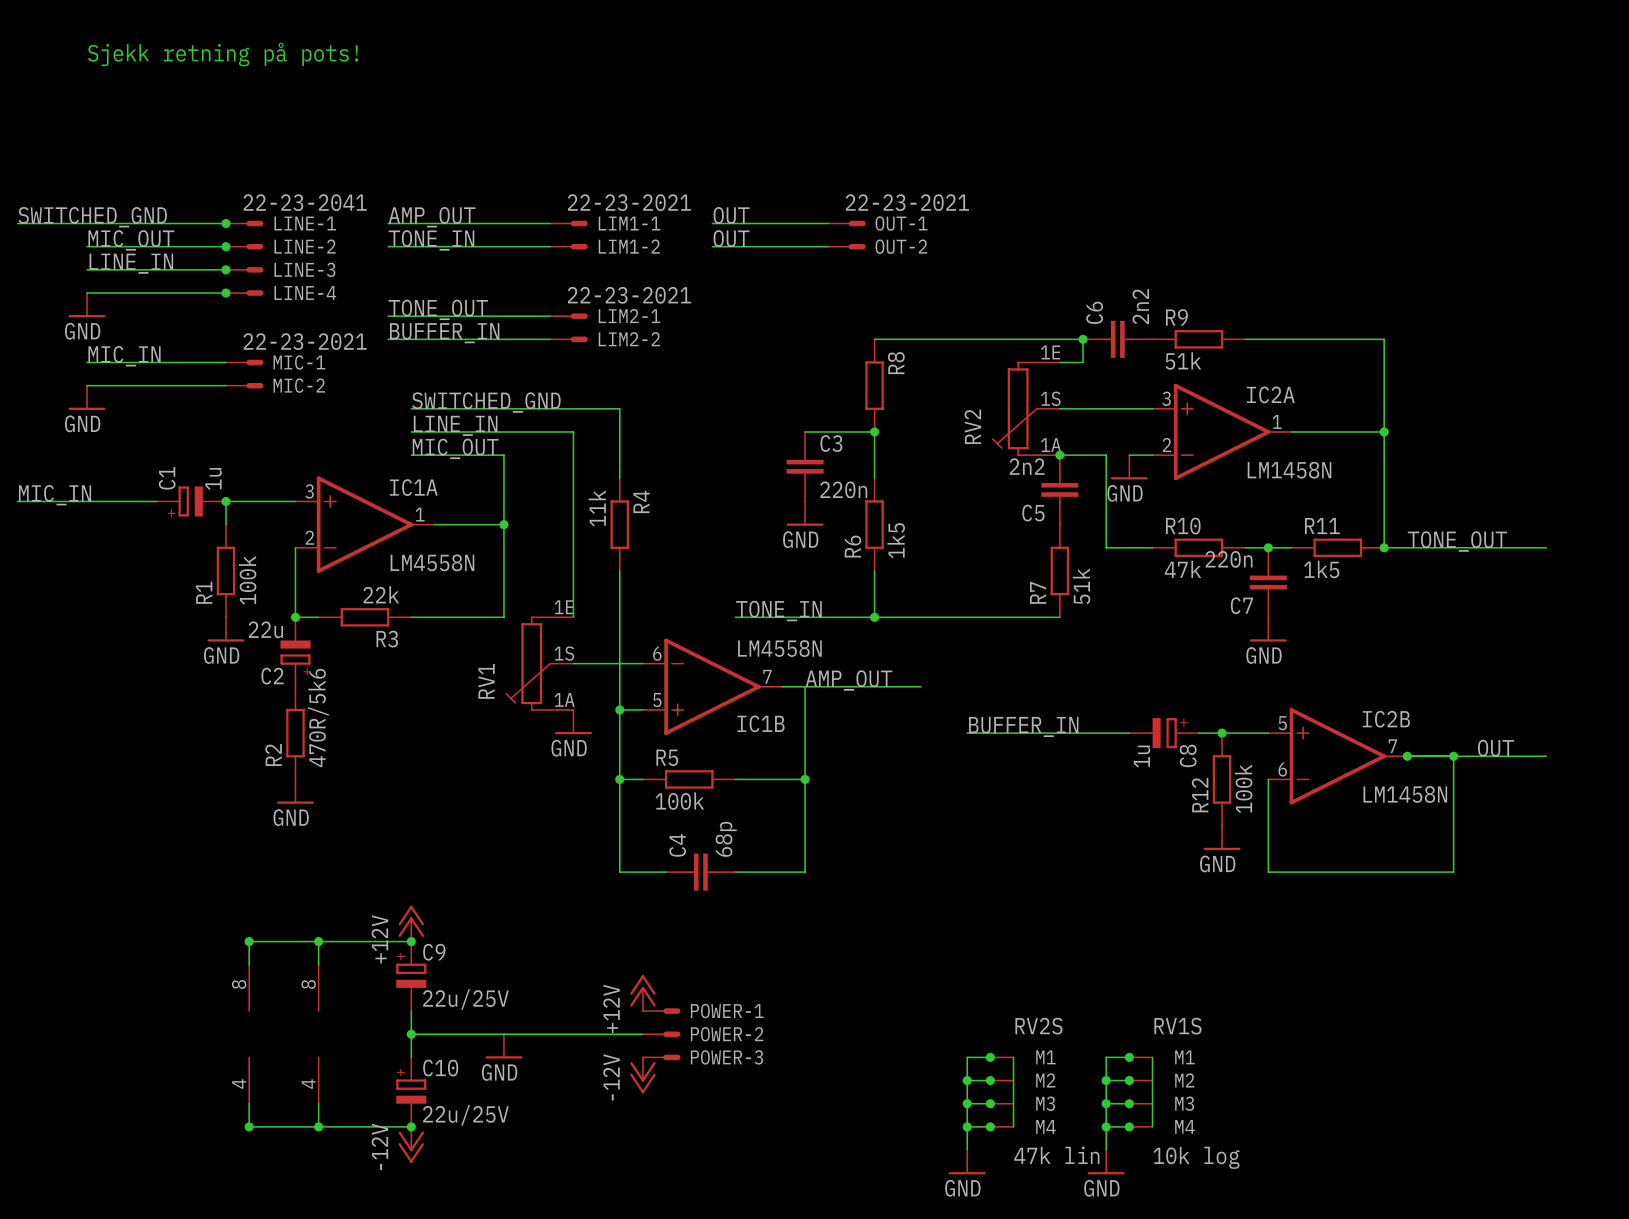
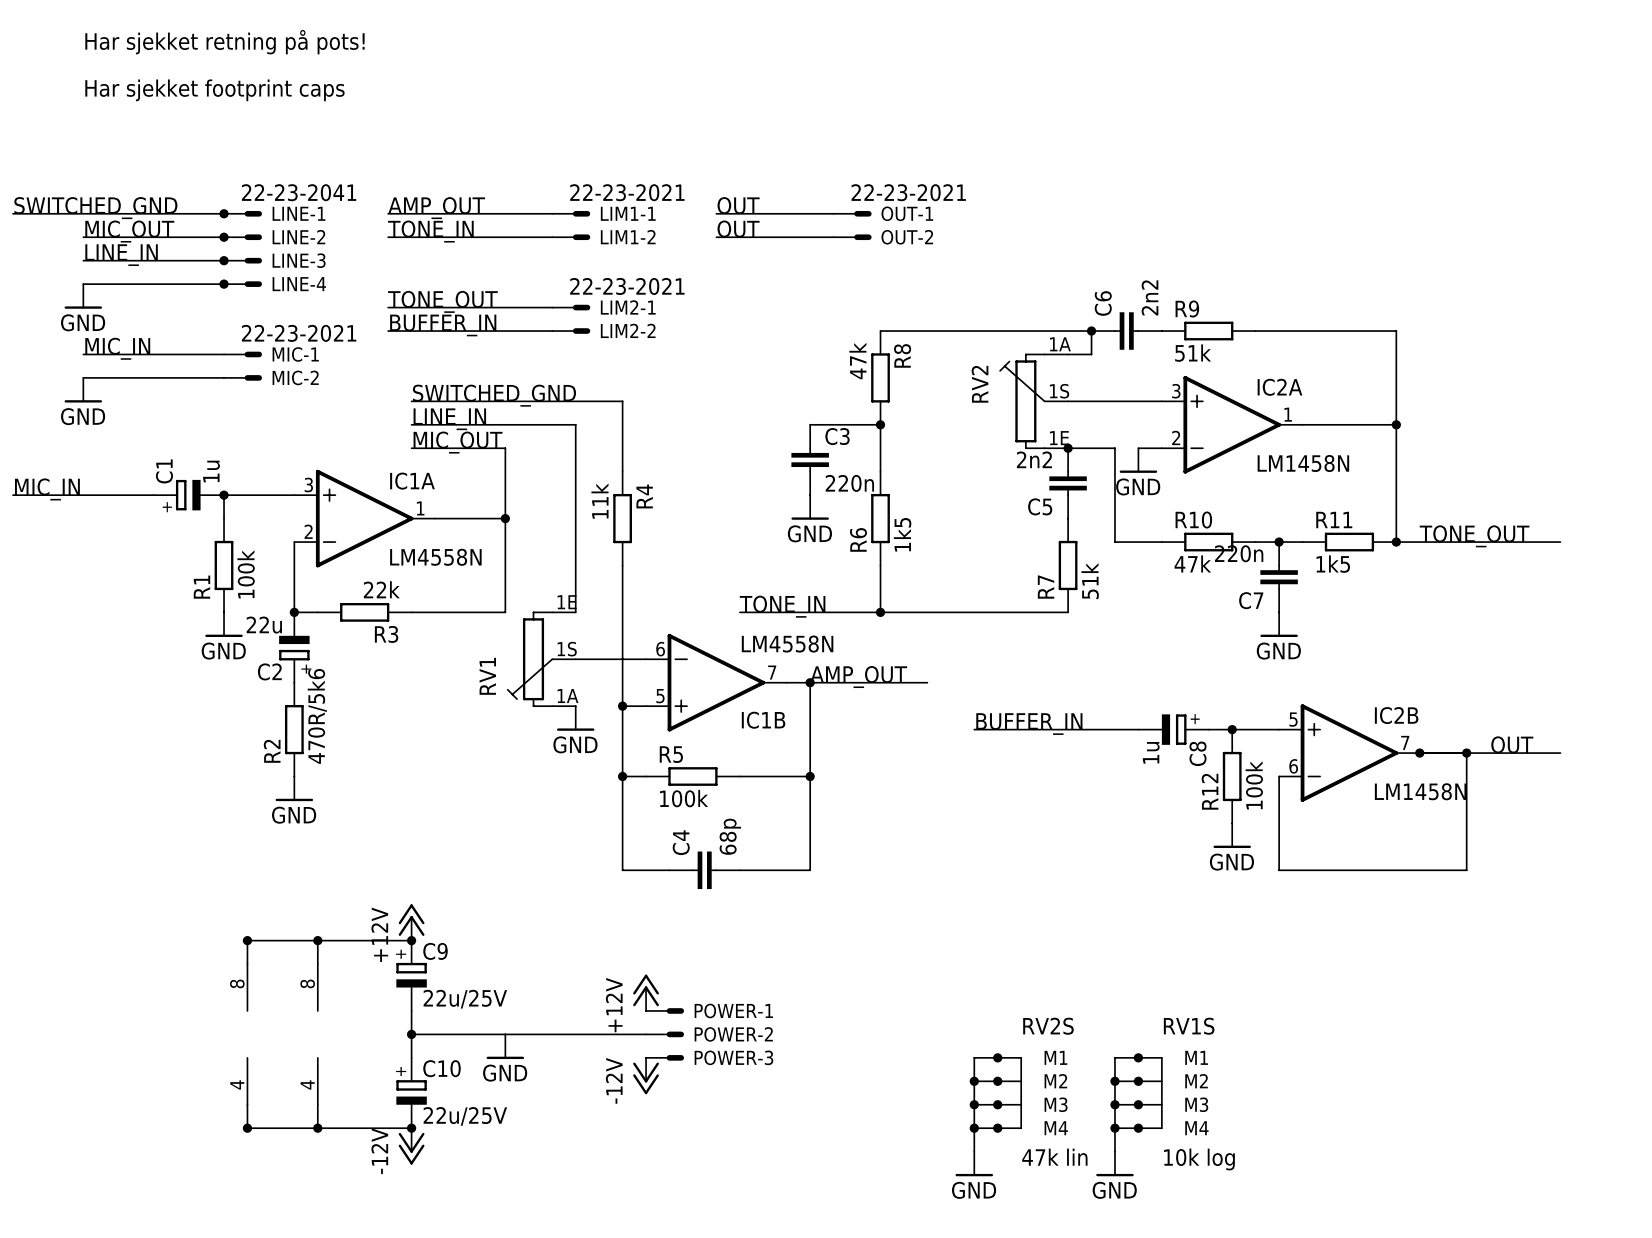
text: Sjekk retning på pots! (223, 54) -> Har sjekket retning på pots! (224, 42)
text: none -> Har sjekket footprint caps (214, 90)
R8 value: none -> 47k (857, 361)
RV2 flip: as is (1014, 408) -> up-down (1022, 401)
junction: none -> (810, 682)

